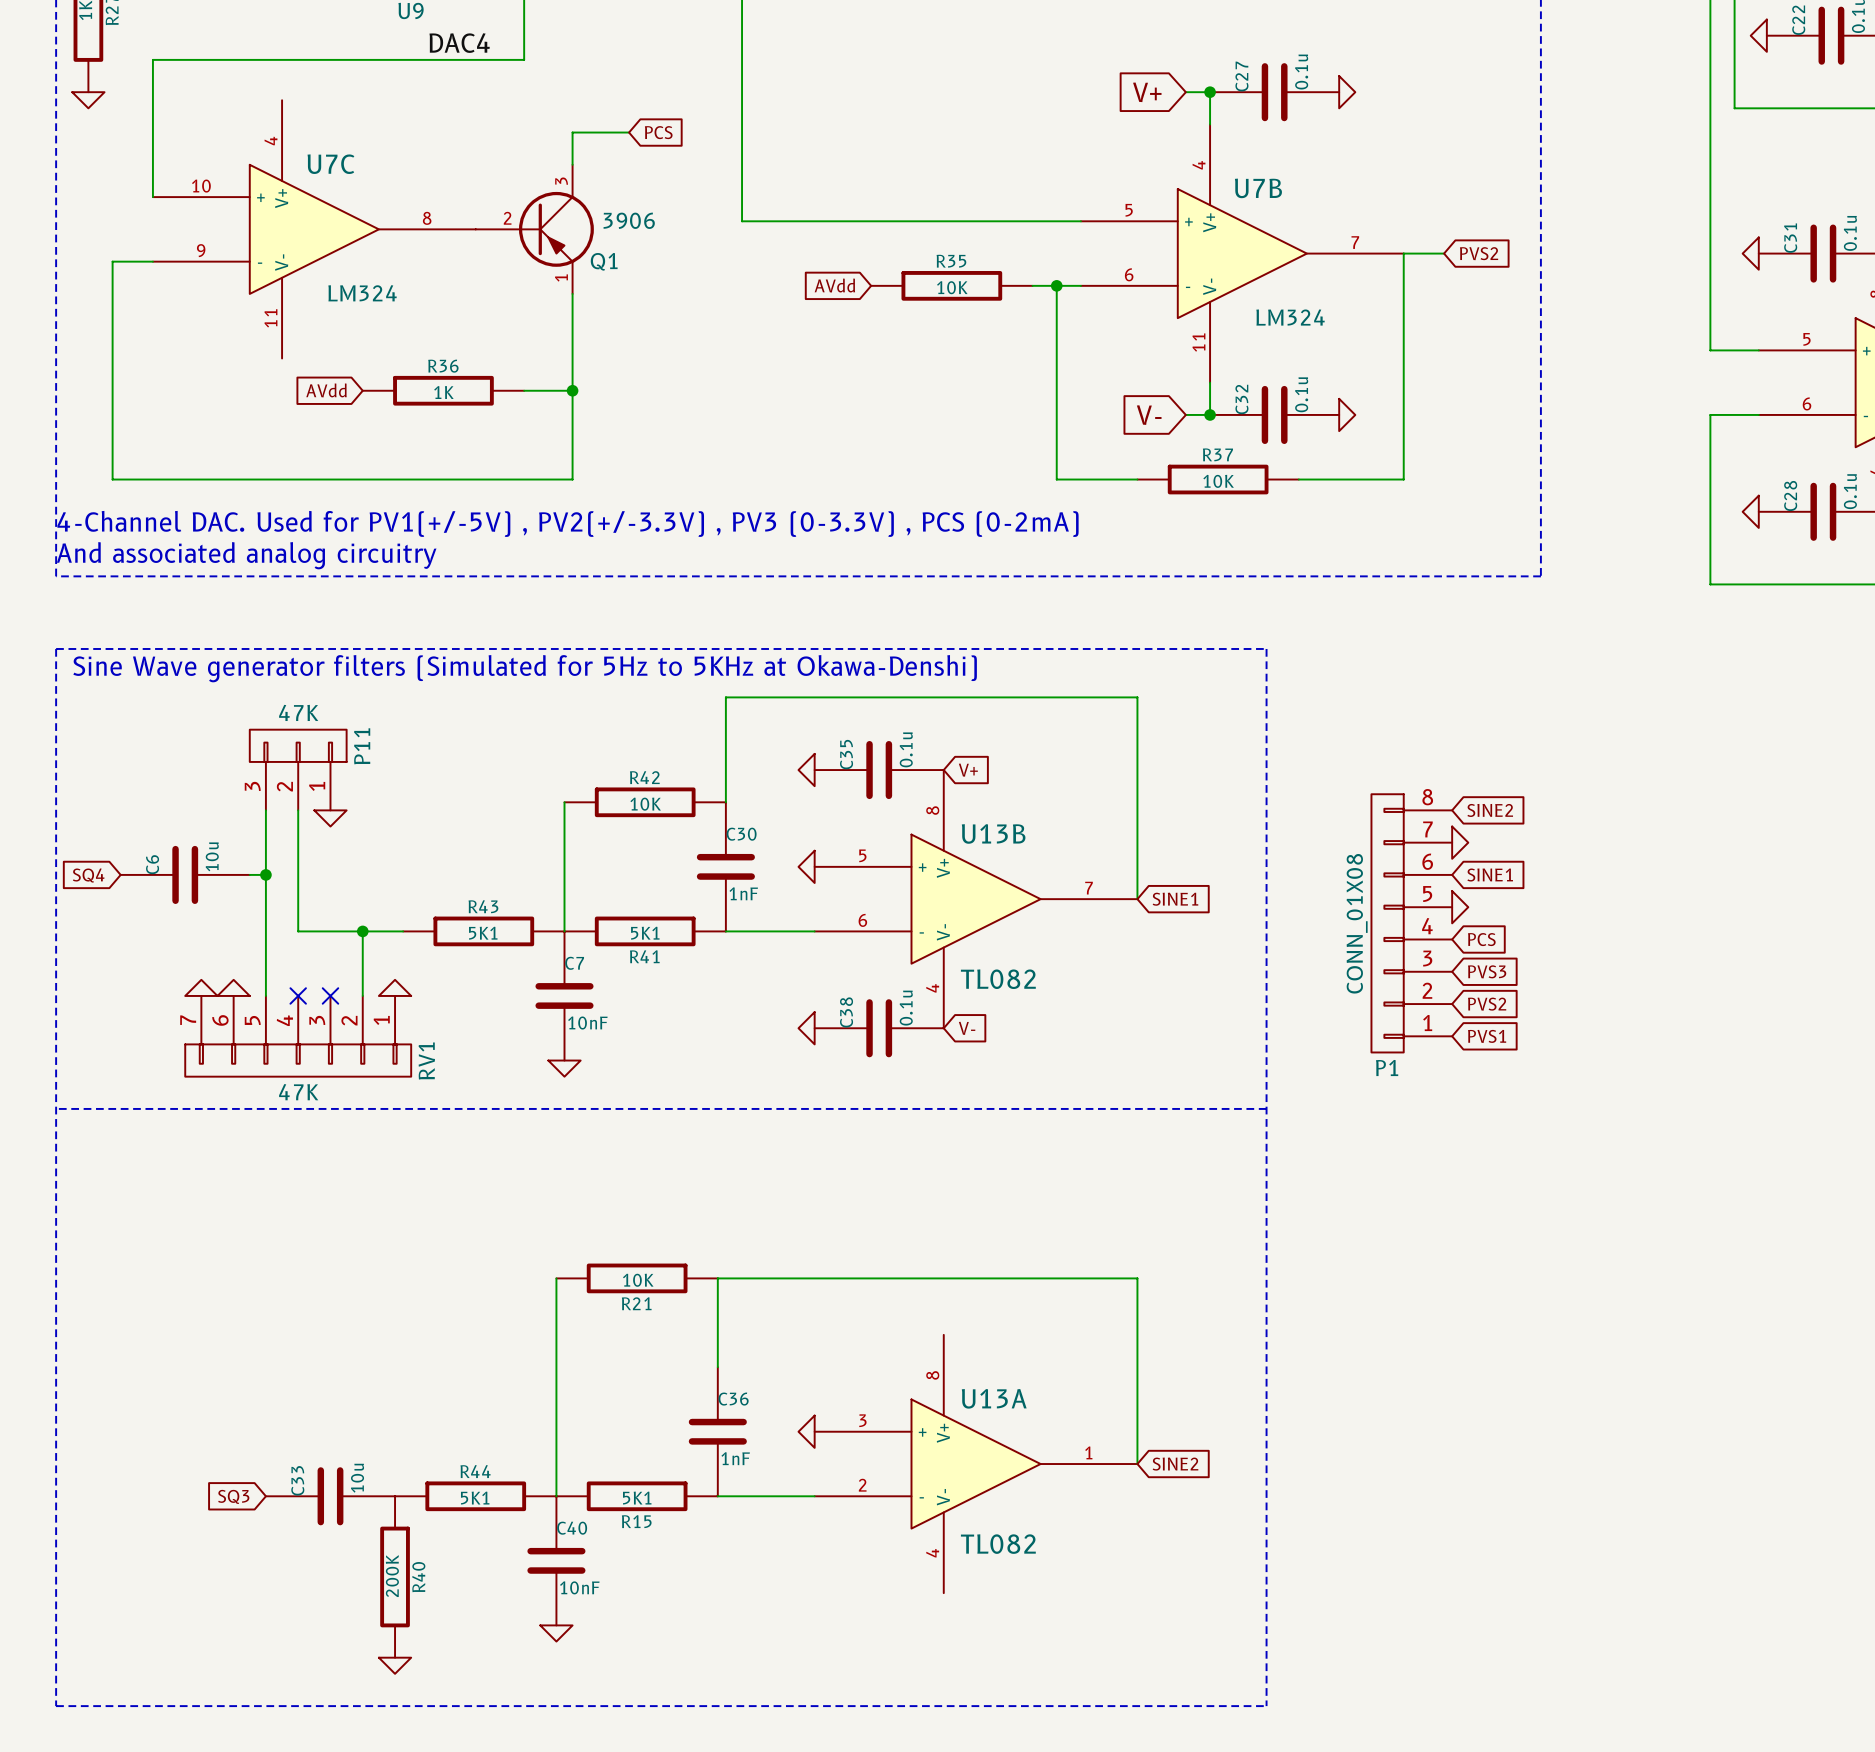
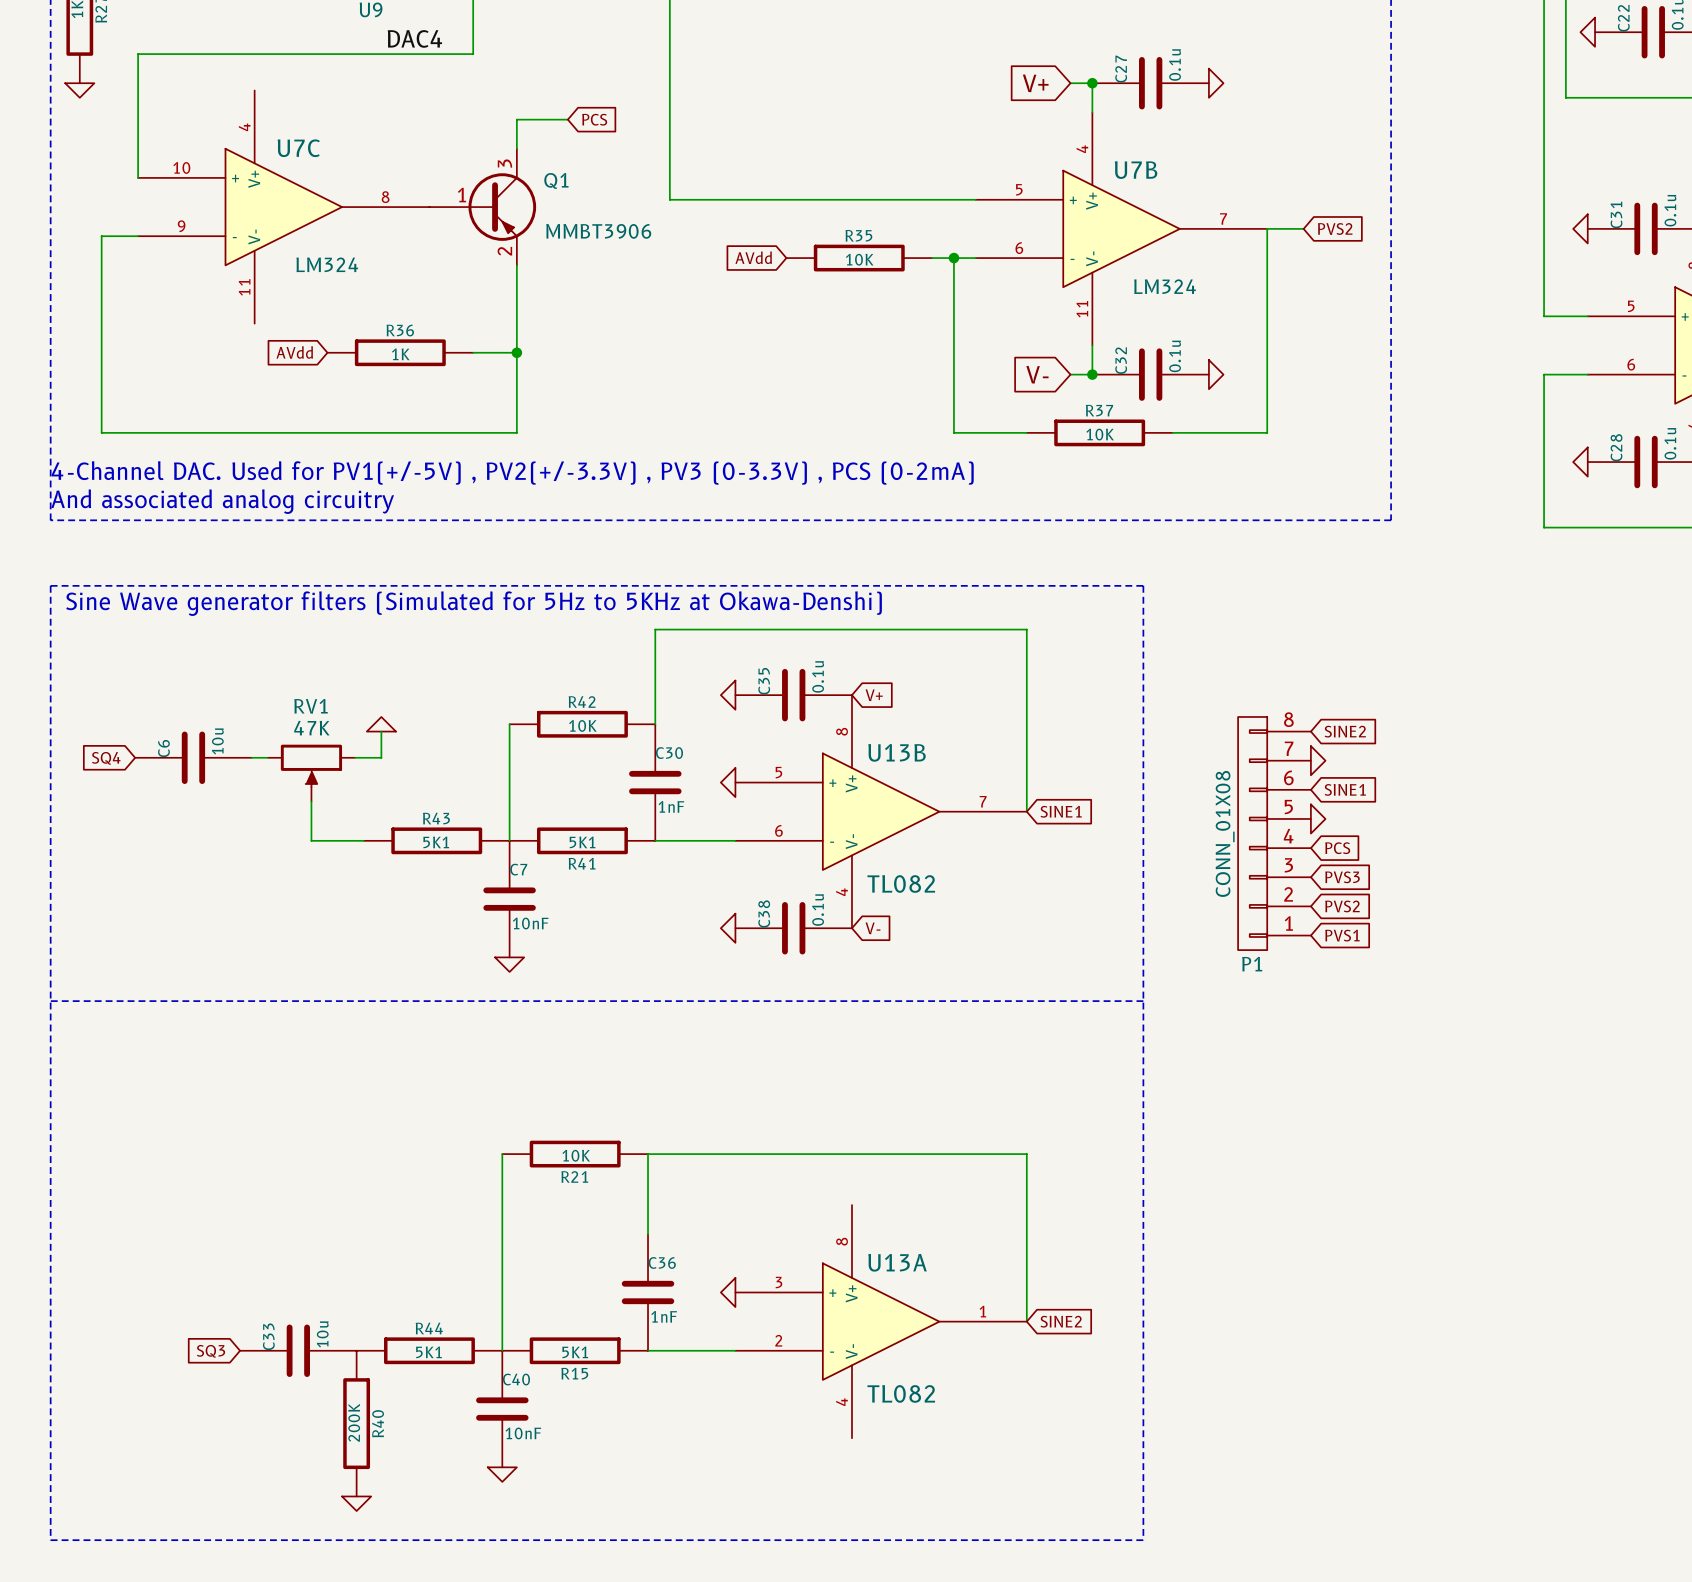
Q1 symbol: [475, 164, 594, 294] -> [429, 148, 537, 266]
Q1 value: 3906 (629, 220) -> MMBT3906 (598, 231)
Q1 name position: Q1 (604, 261) -> Q1 (556, 180)
P11: 47K (298, 770) -> none
wire: (265, 810) (265, 995) -> none
wire: (298, 810) (298, 931) (345, 931) -> (311, 801) (311, 840)
wire: none -> (381, 731) (381, 757) (355, 757)
power symbol rotation: 0° (330, 818) -> 180° (381, 724)
power symbol position: (330, 818) -> (381, 724)
wire: none -> (251, 757) (267, 757)
C6 position: (185, 874) -> (193, 757)
wire: (249, 874) (265, 874) -> none
junction: (265, 874) -> none
global label position: SQ4 (88, 875) -> SQ4 (106, 758)
wire: (362, 931) (362, 995) -> none
junction: (362, 931) -> none
power symbol: (201, 987) -> none
power symbol: (233, 987) -> none
power symbol: (395, 987) -> none
RV1 symbol: [185, 995, 412, 1077] -> [267, 744, 356, 802]
no-connect mark: (298, 995) -> none
no-connect mark: (330, 995) -> none
RV1 name position: RV1 (426, 1061) -> RV1 (311, 706)
RV1 value position: 47K (298, 1092) -> 47K (311, 728)

